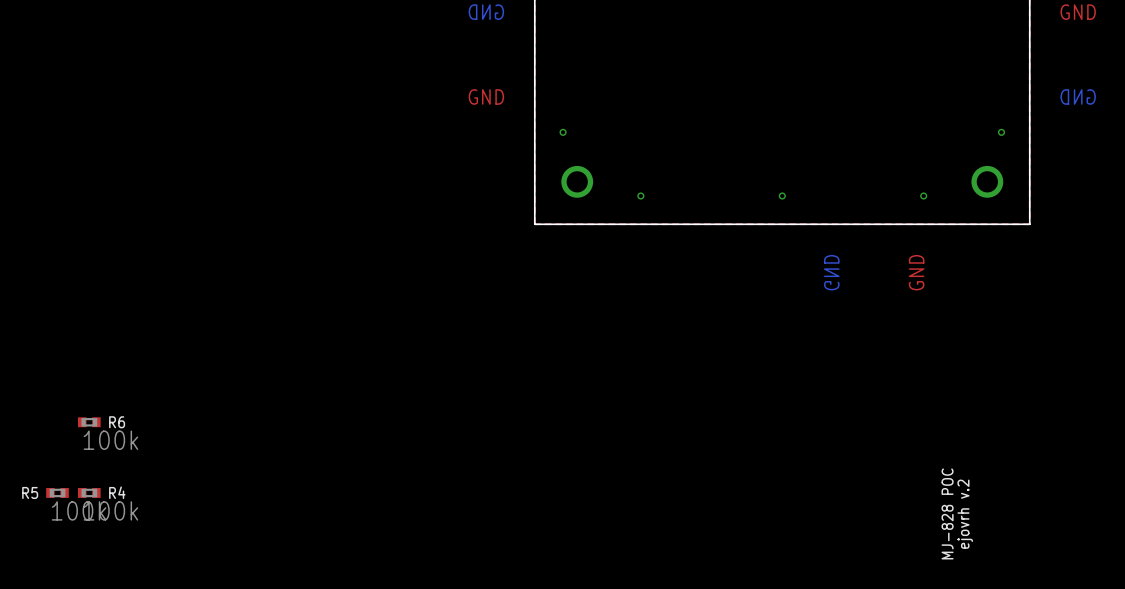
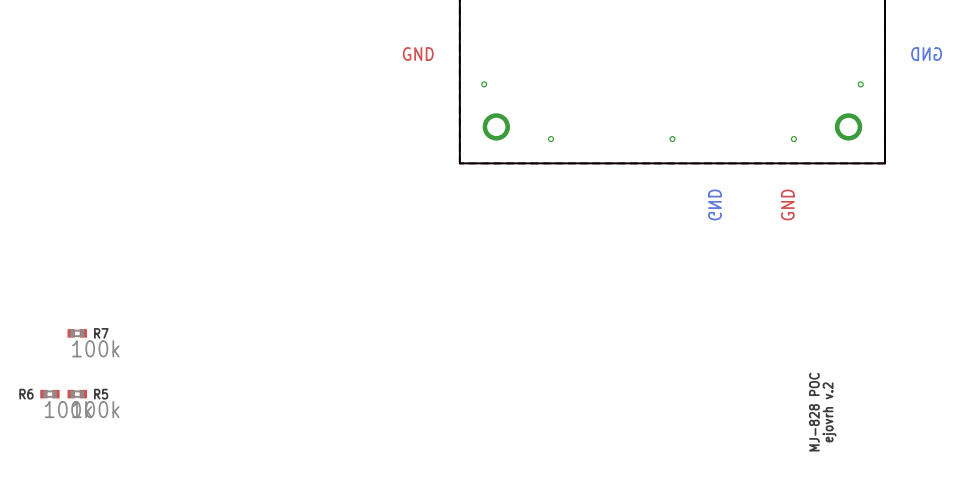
R6 name: R6 (117, 422) -> R7 (101, 333)
R5 name: R5 (30, 492) -> R6 (26, 394)
R4 name: R4 (117, 492) -> R5 (101, 394)

